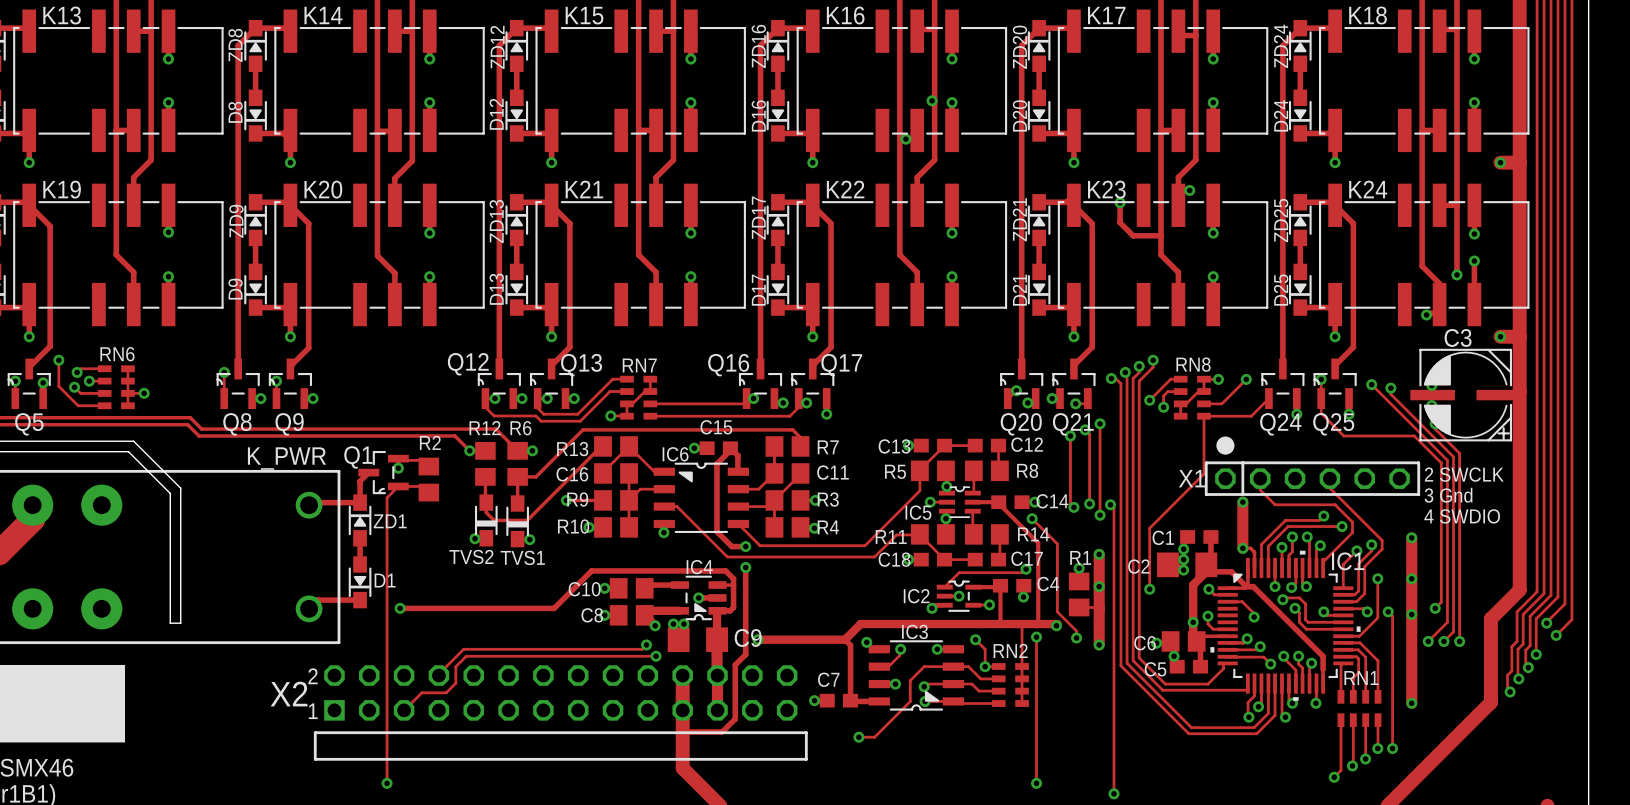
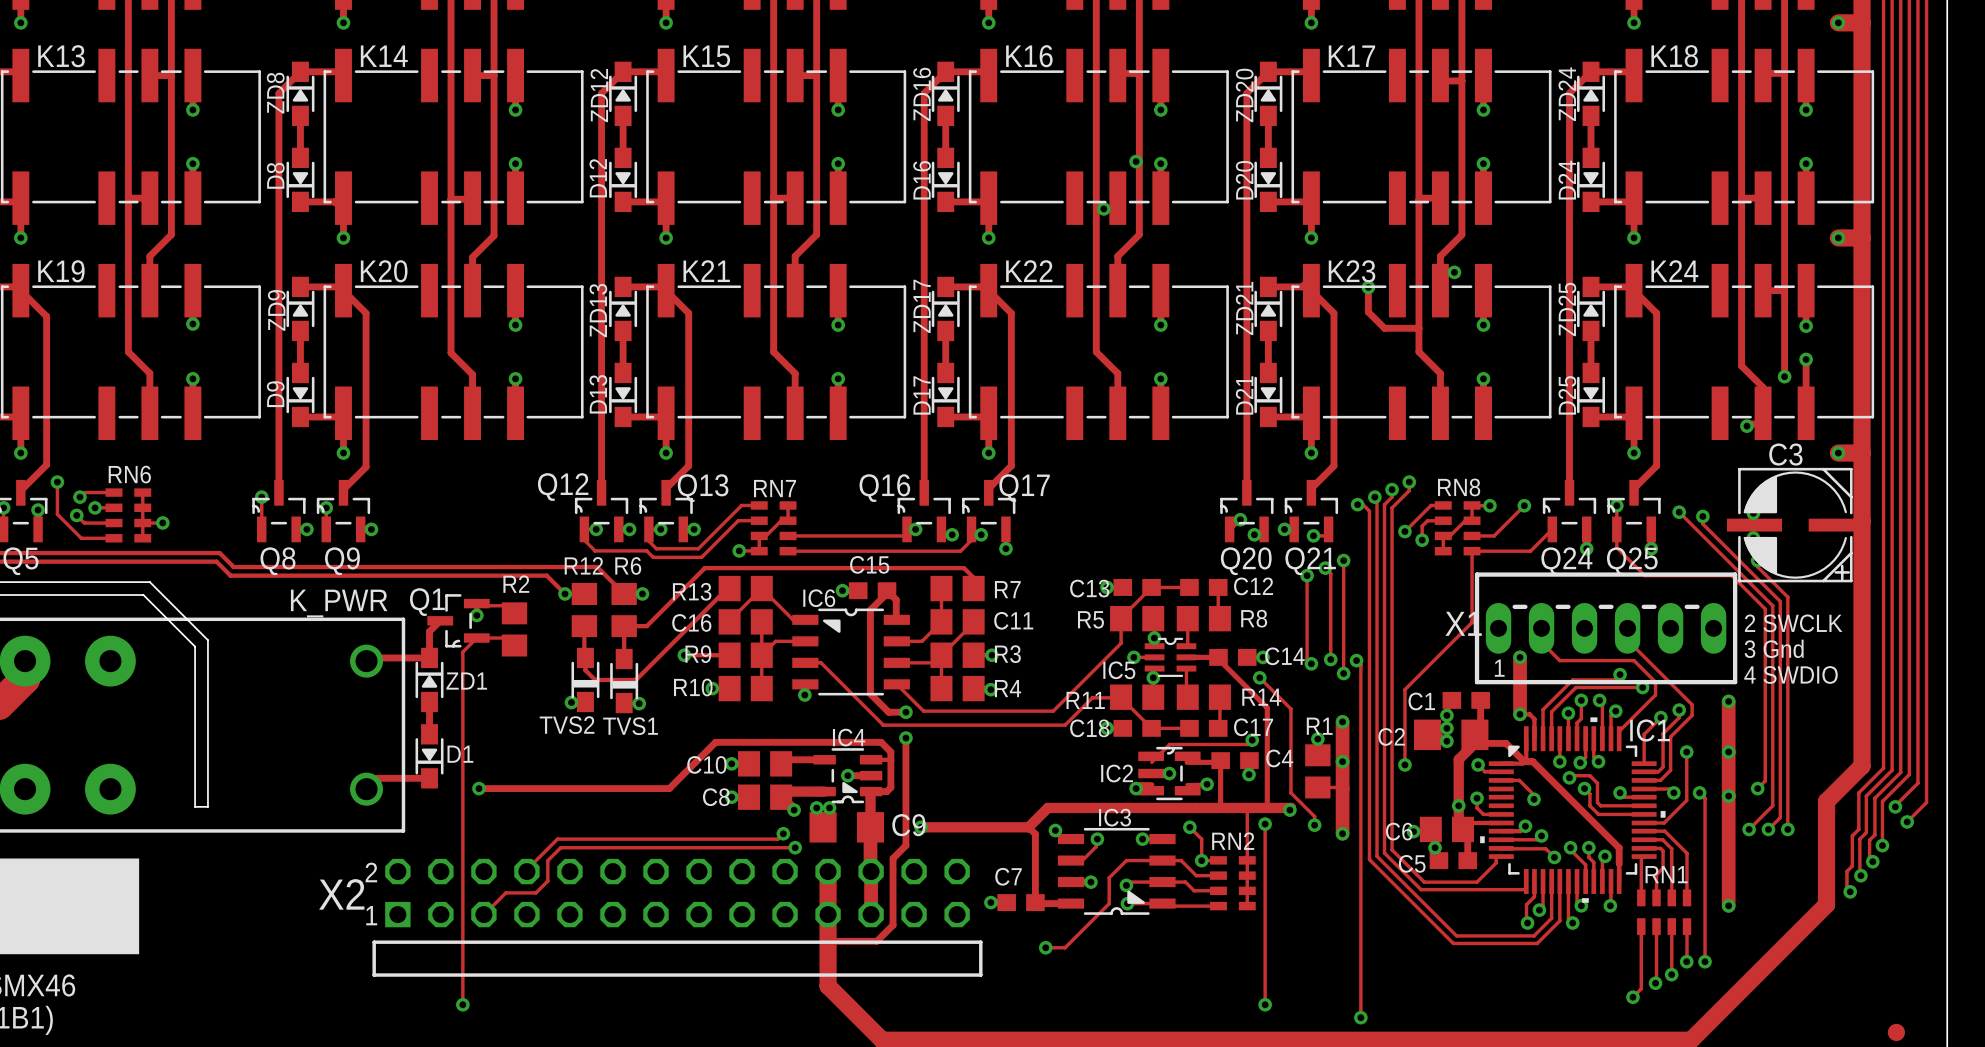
drawing: [1216, 436, 1235, 455] -> none
X1 footprint: [1204, 461, 1421, 496] -> [1474, 572, 1738, 685]
IC2 footprint: [936, 580, 982, 612] -> [1138, 746, 1201, 801]

